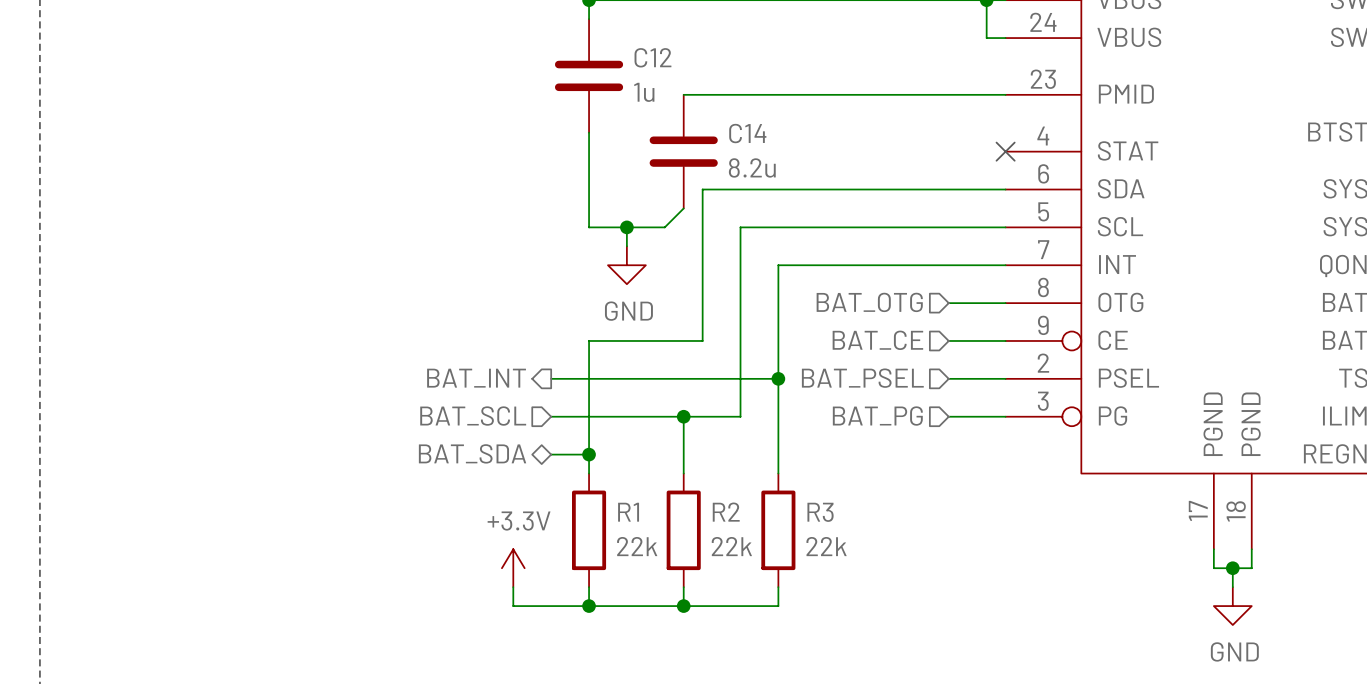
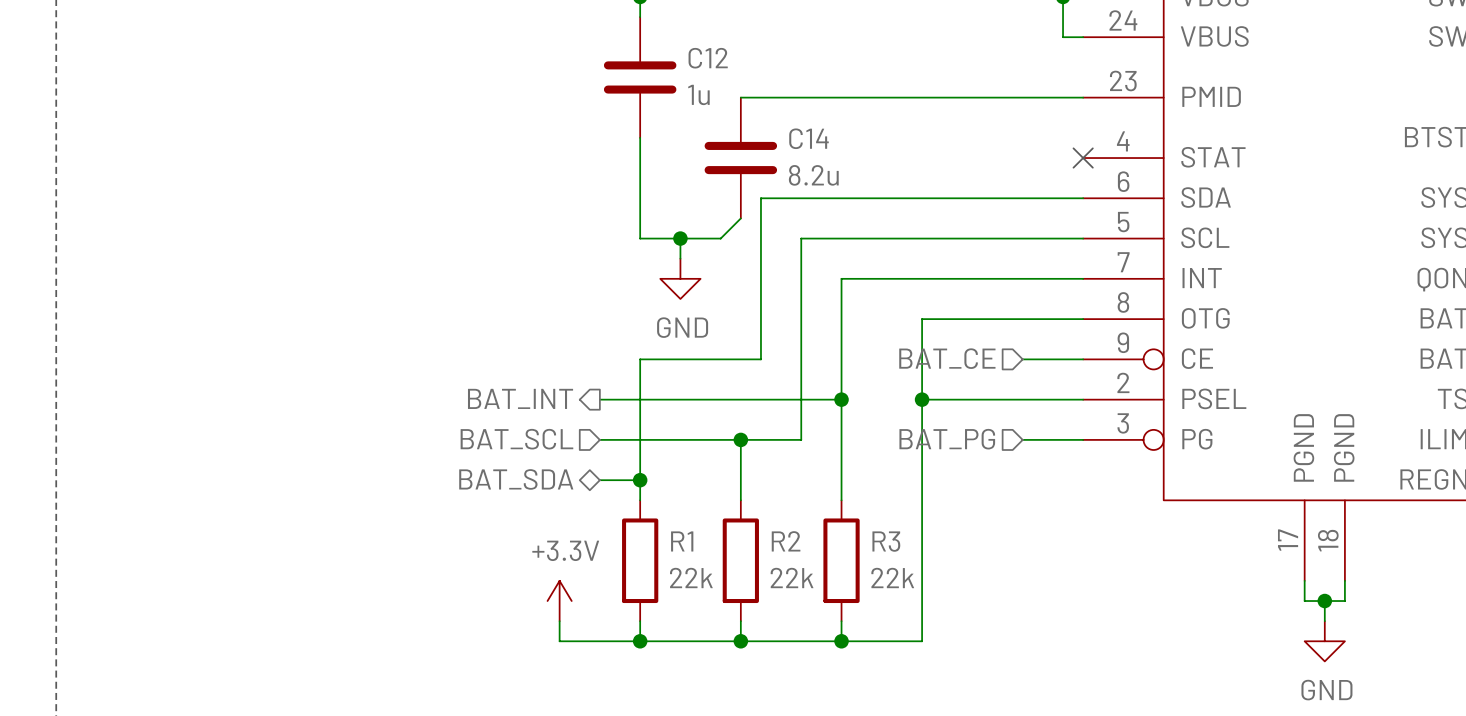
hierarchical label: BAT_OTG (869, 302) -> none
wire: none -> (1022, 319) (922, 319) (922, 641) (841, 641)
wire: none -> (922, 399) (1022, 399)
junction: none -> (922, 399)
hierarchical label: BAT_PSEL (862, 378) -> none
junction: none -> (841, 641)

